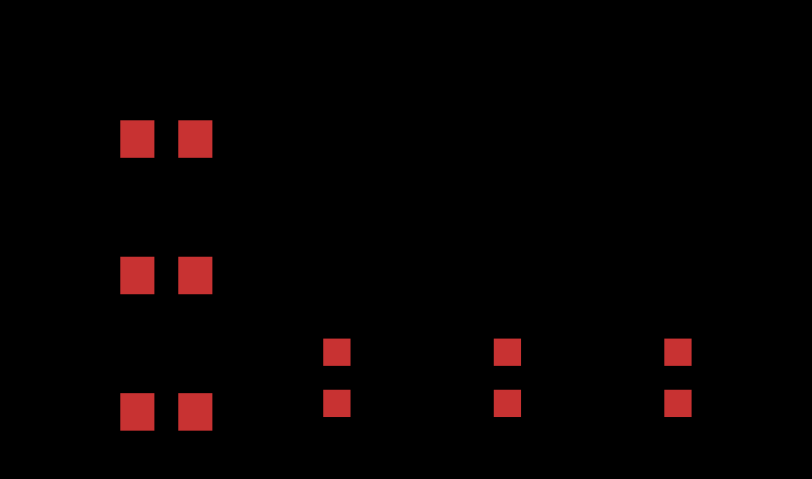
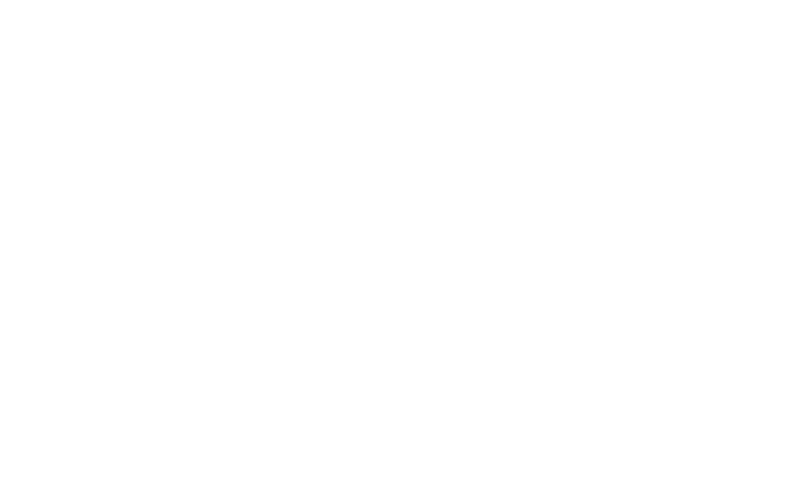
part: (166, 139) -> none
part: (166, 275) -> none
part: (336, 377) -> none
part: (507, 377) -> none
part: (677, 377) -> none
part: (166, 411) -> none

